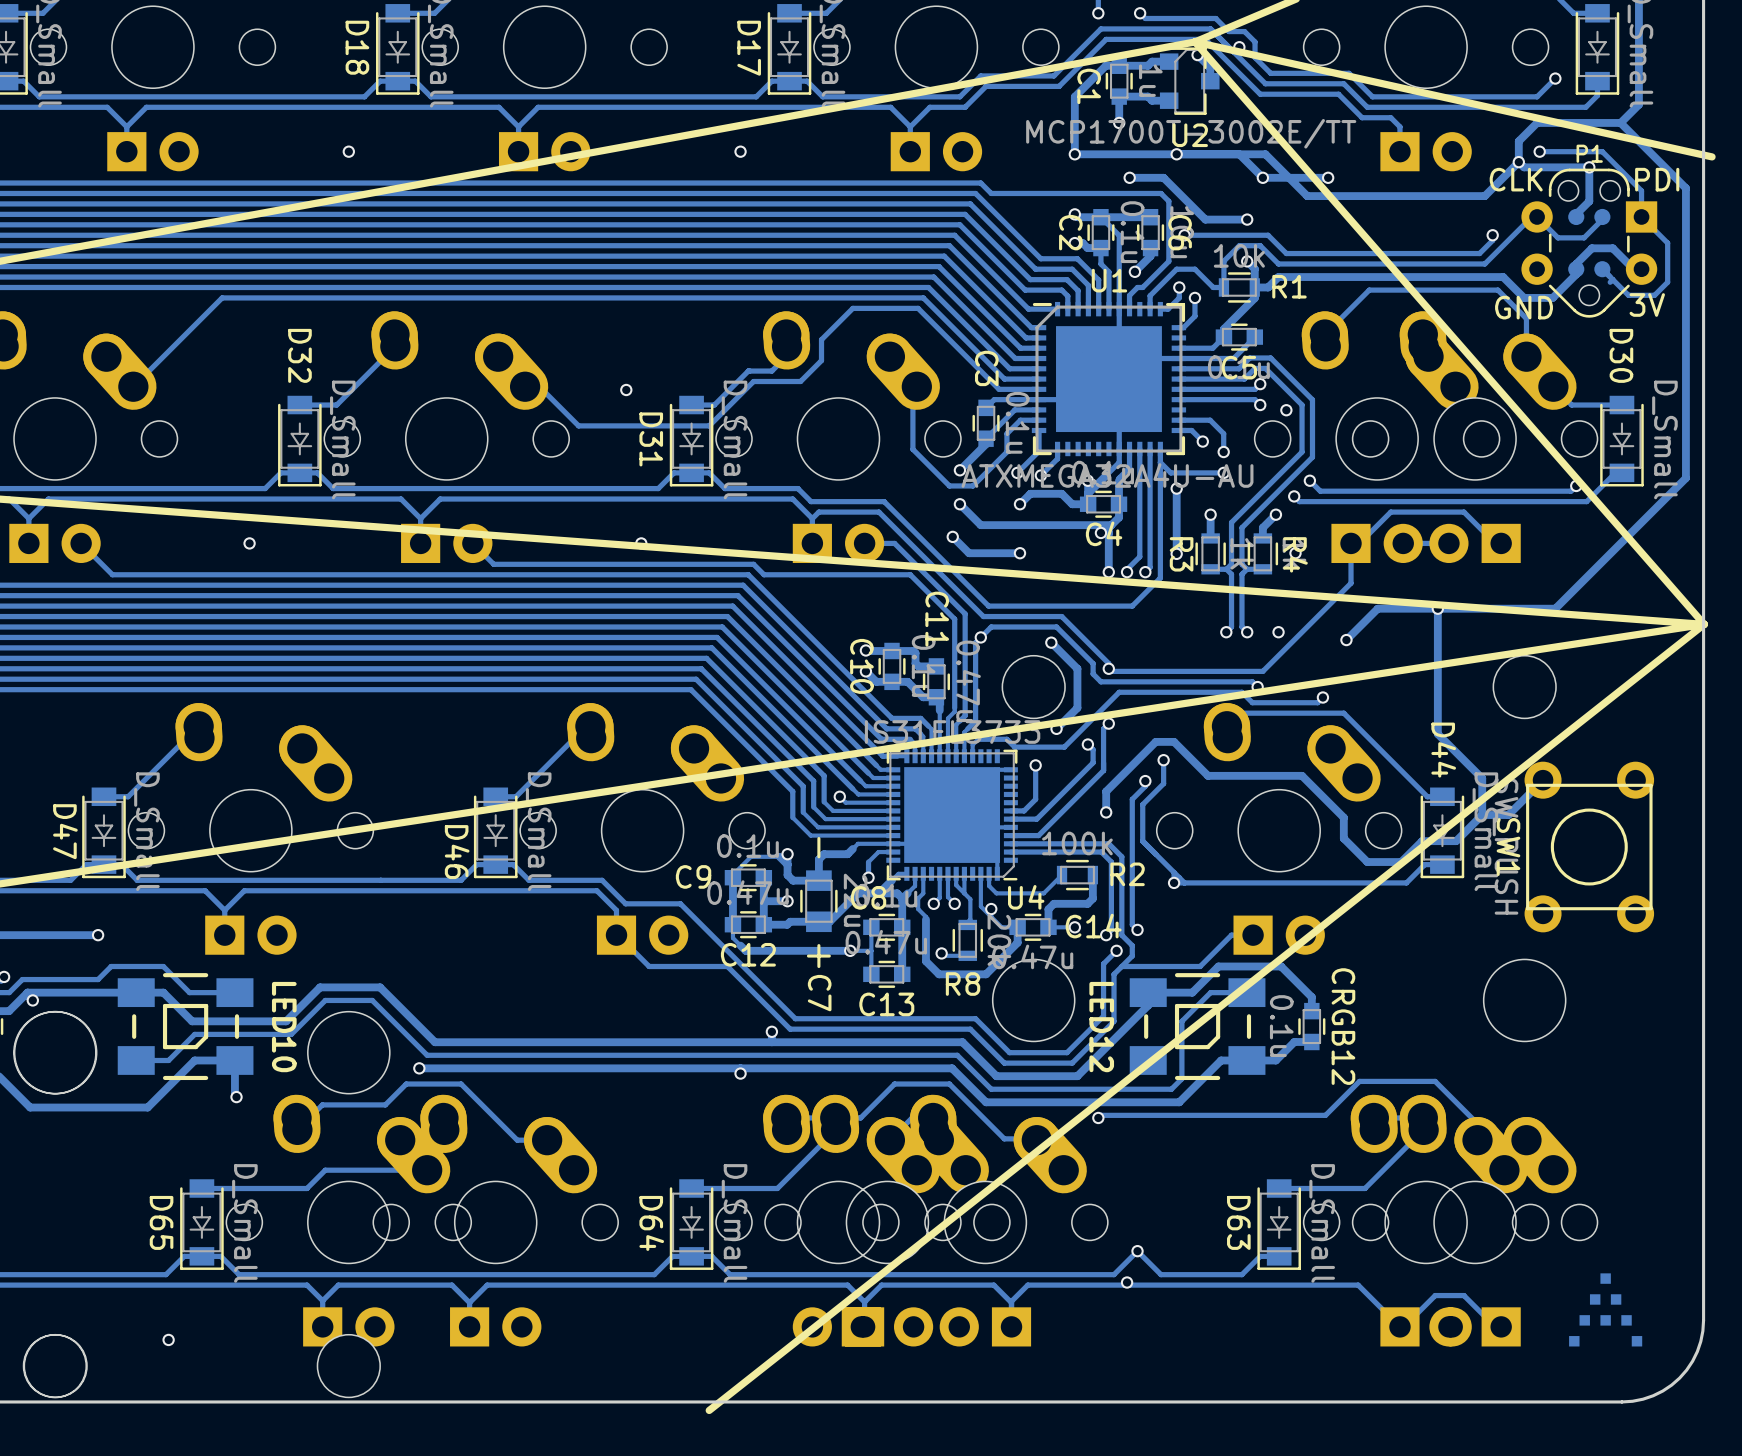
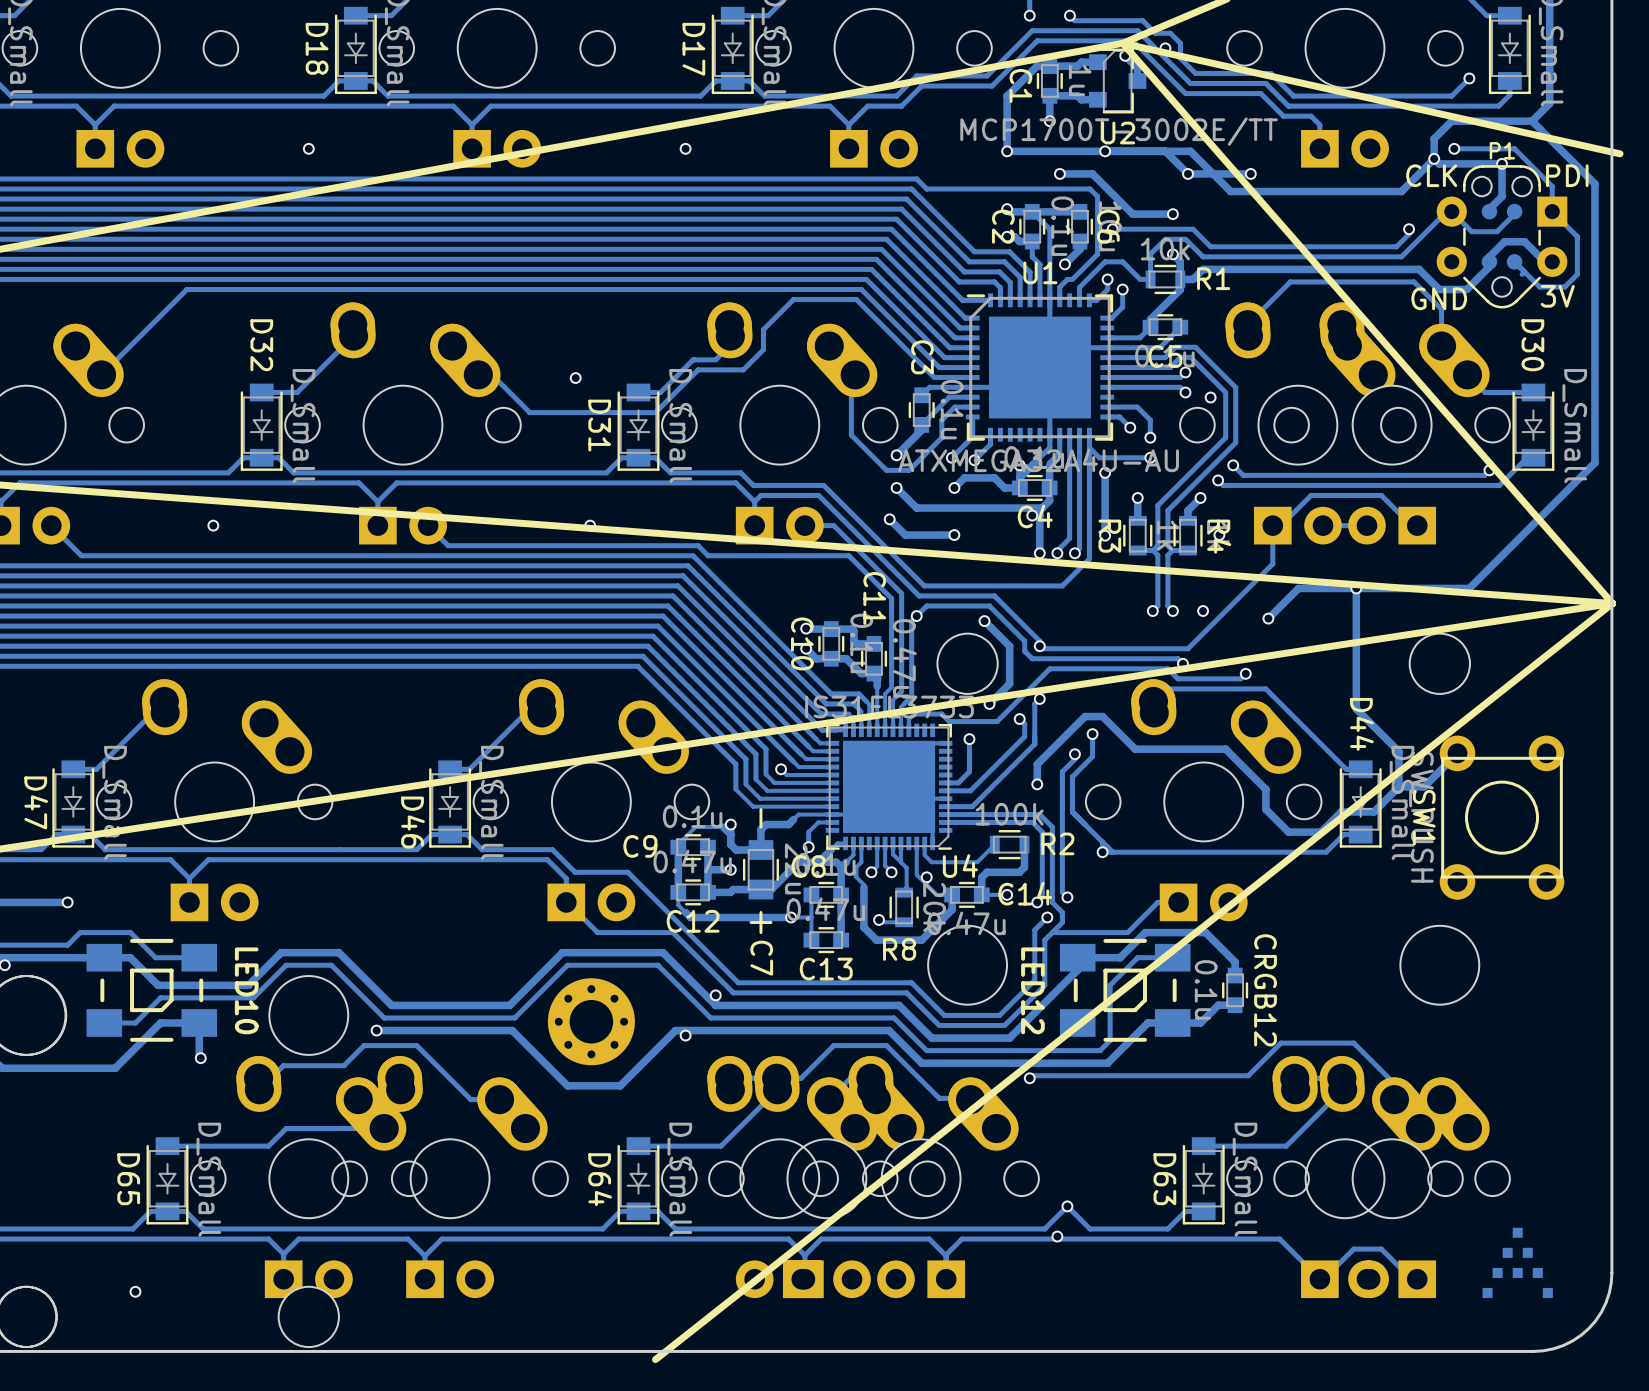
track: (771, 1042) (557, 1042) -> (715, 1005) (662, 952) (562, 952) (509, 1005)
track: (766, 1055) (562, 1055) -> (710, 1017) (657, 965) (567, 965) (514, 1017)
part: none -> (591, 1021)
track: (730, 1068) (560, 1068) -> (675, 1030) (620, 1085) (567, 1085) (512, 1030)

